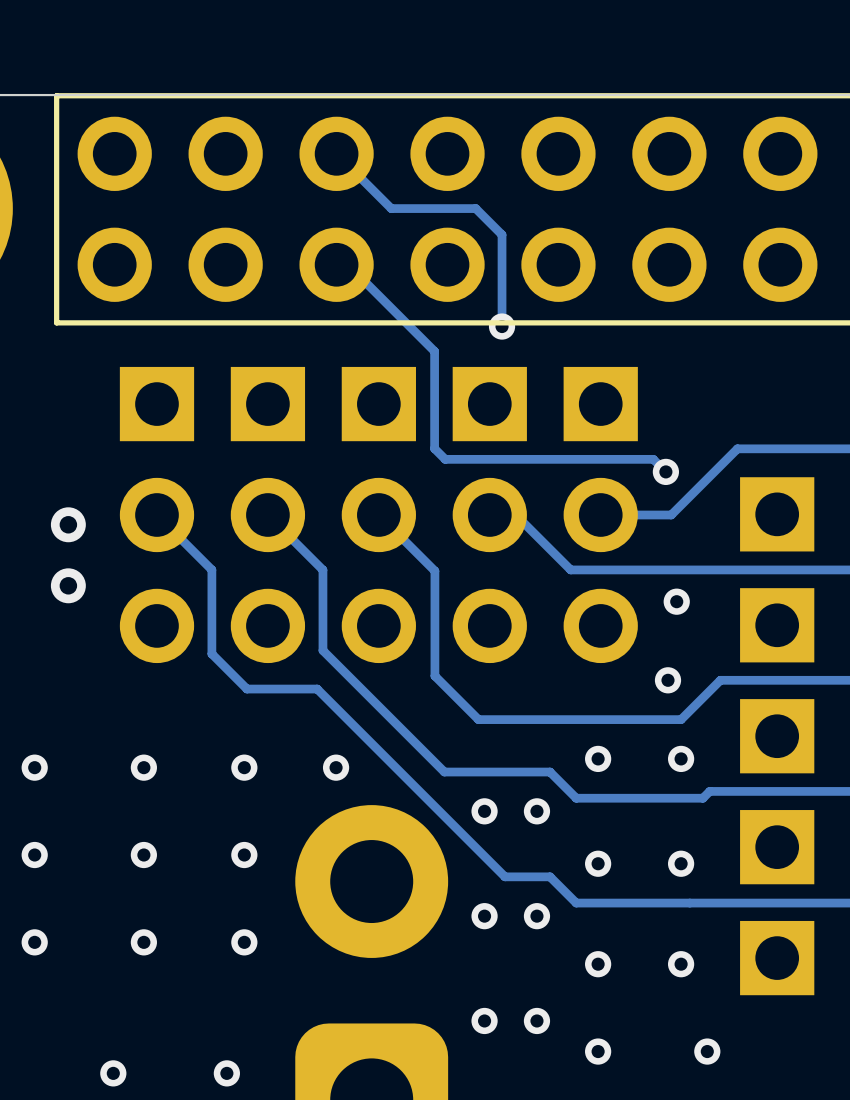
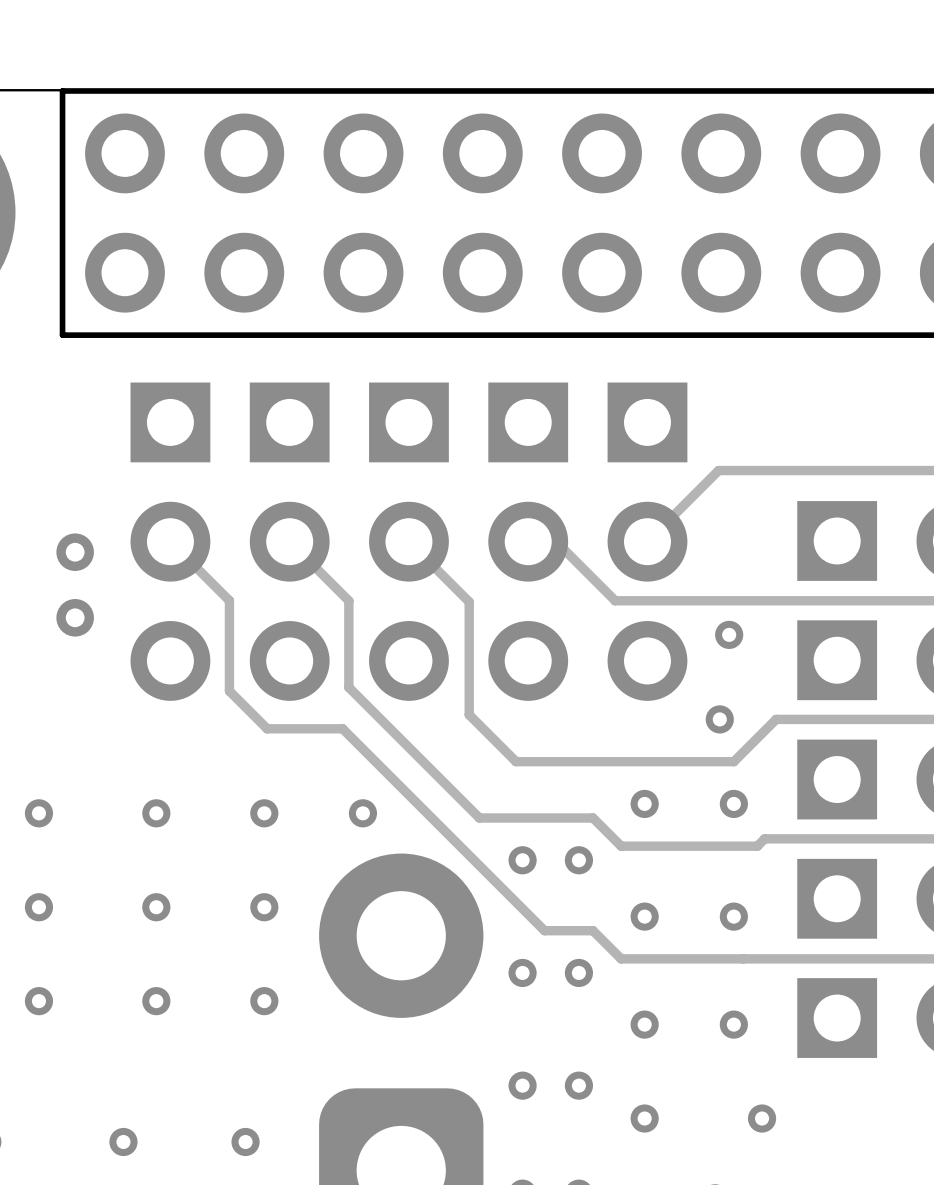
track: (336, 153) (391, 208) (475, 208) (502, 234) (502, 326) -> none
track: (336, 264) (347, 264) (434, 351) (434, 448) (445, 459) (653, 459) (665, 471) -> none
via: (502, 326) -> none
track: (737, 448) (671, 514) (600, 514) -> (794, 470) (718, 470) (647, 541)
via: (665, 471) -> none

